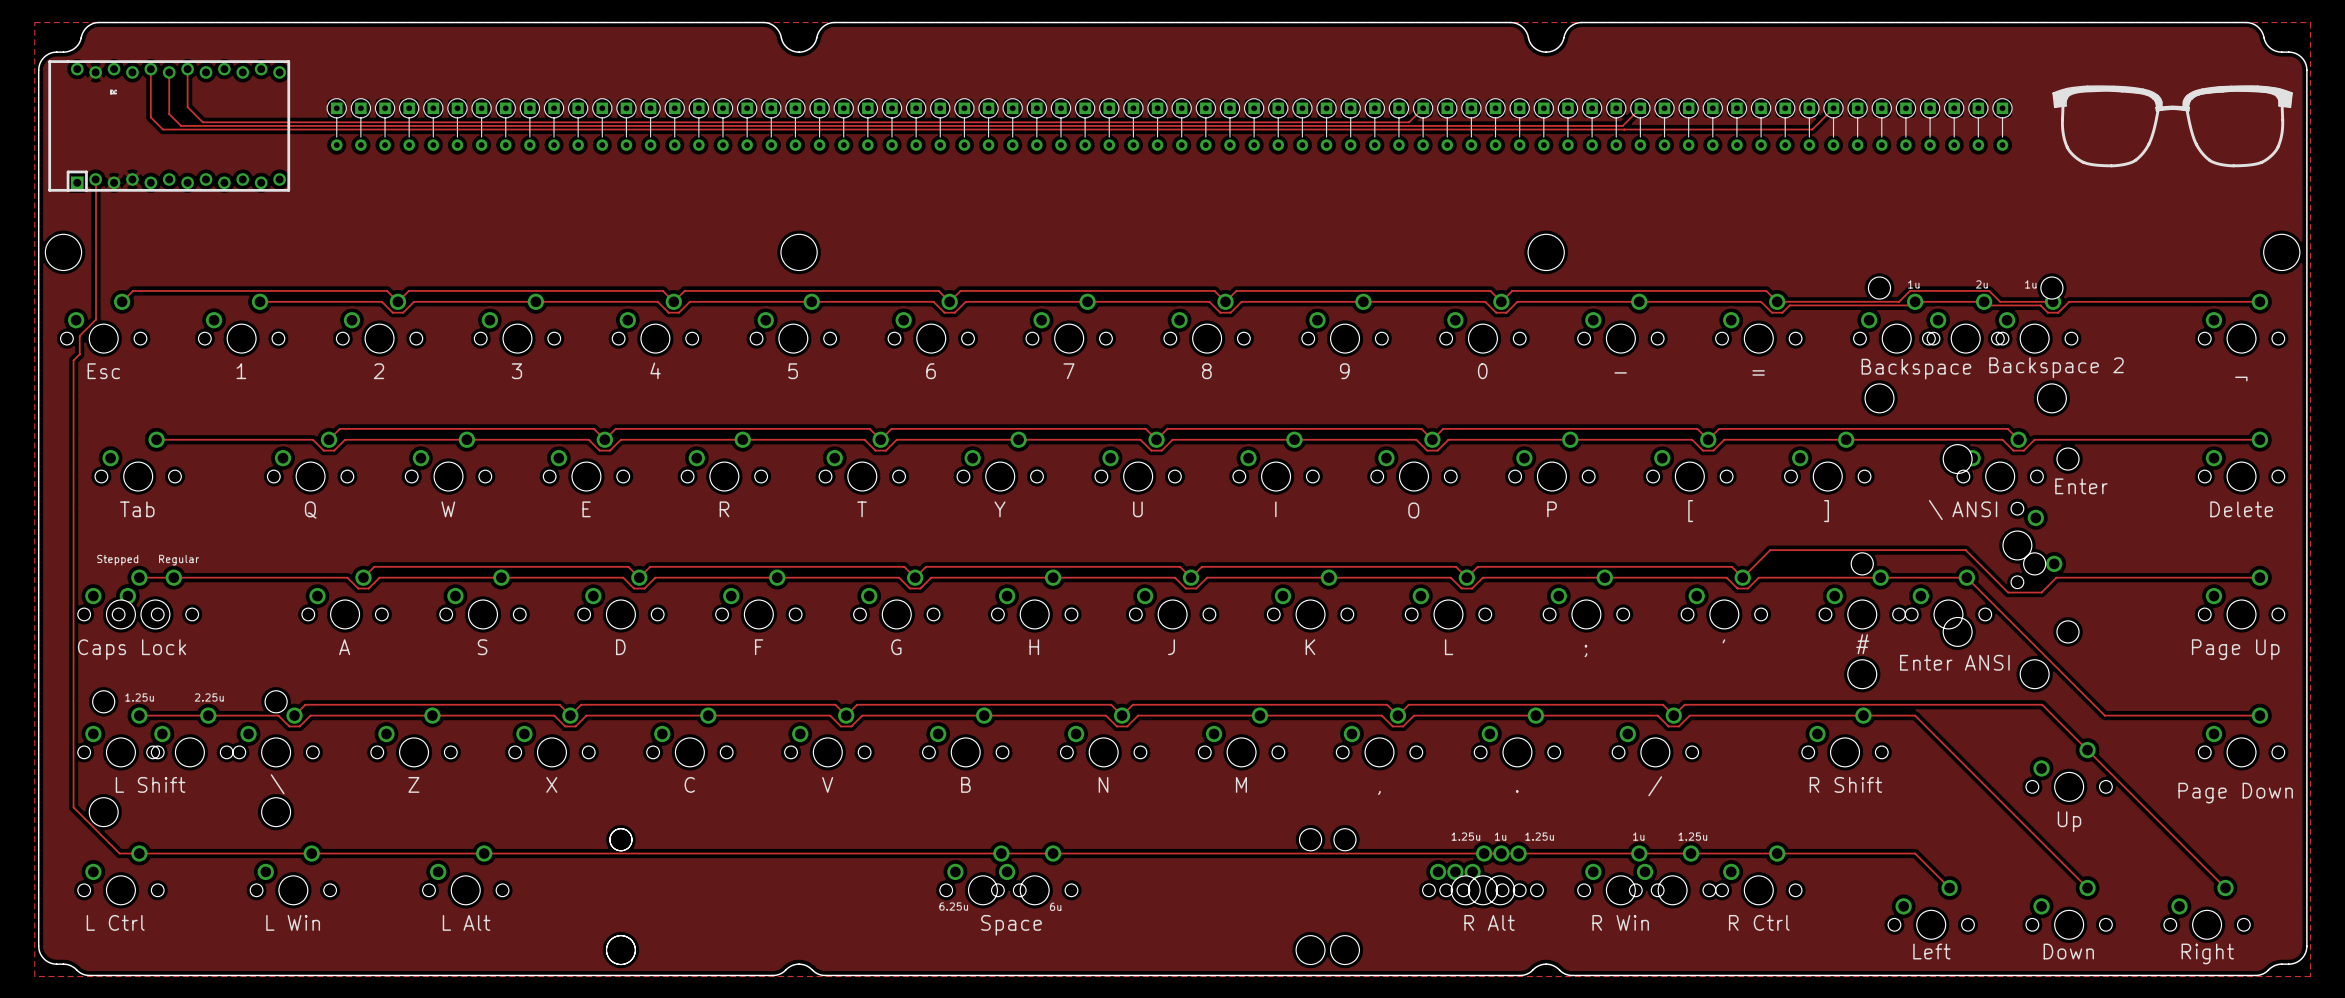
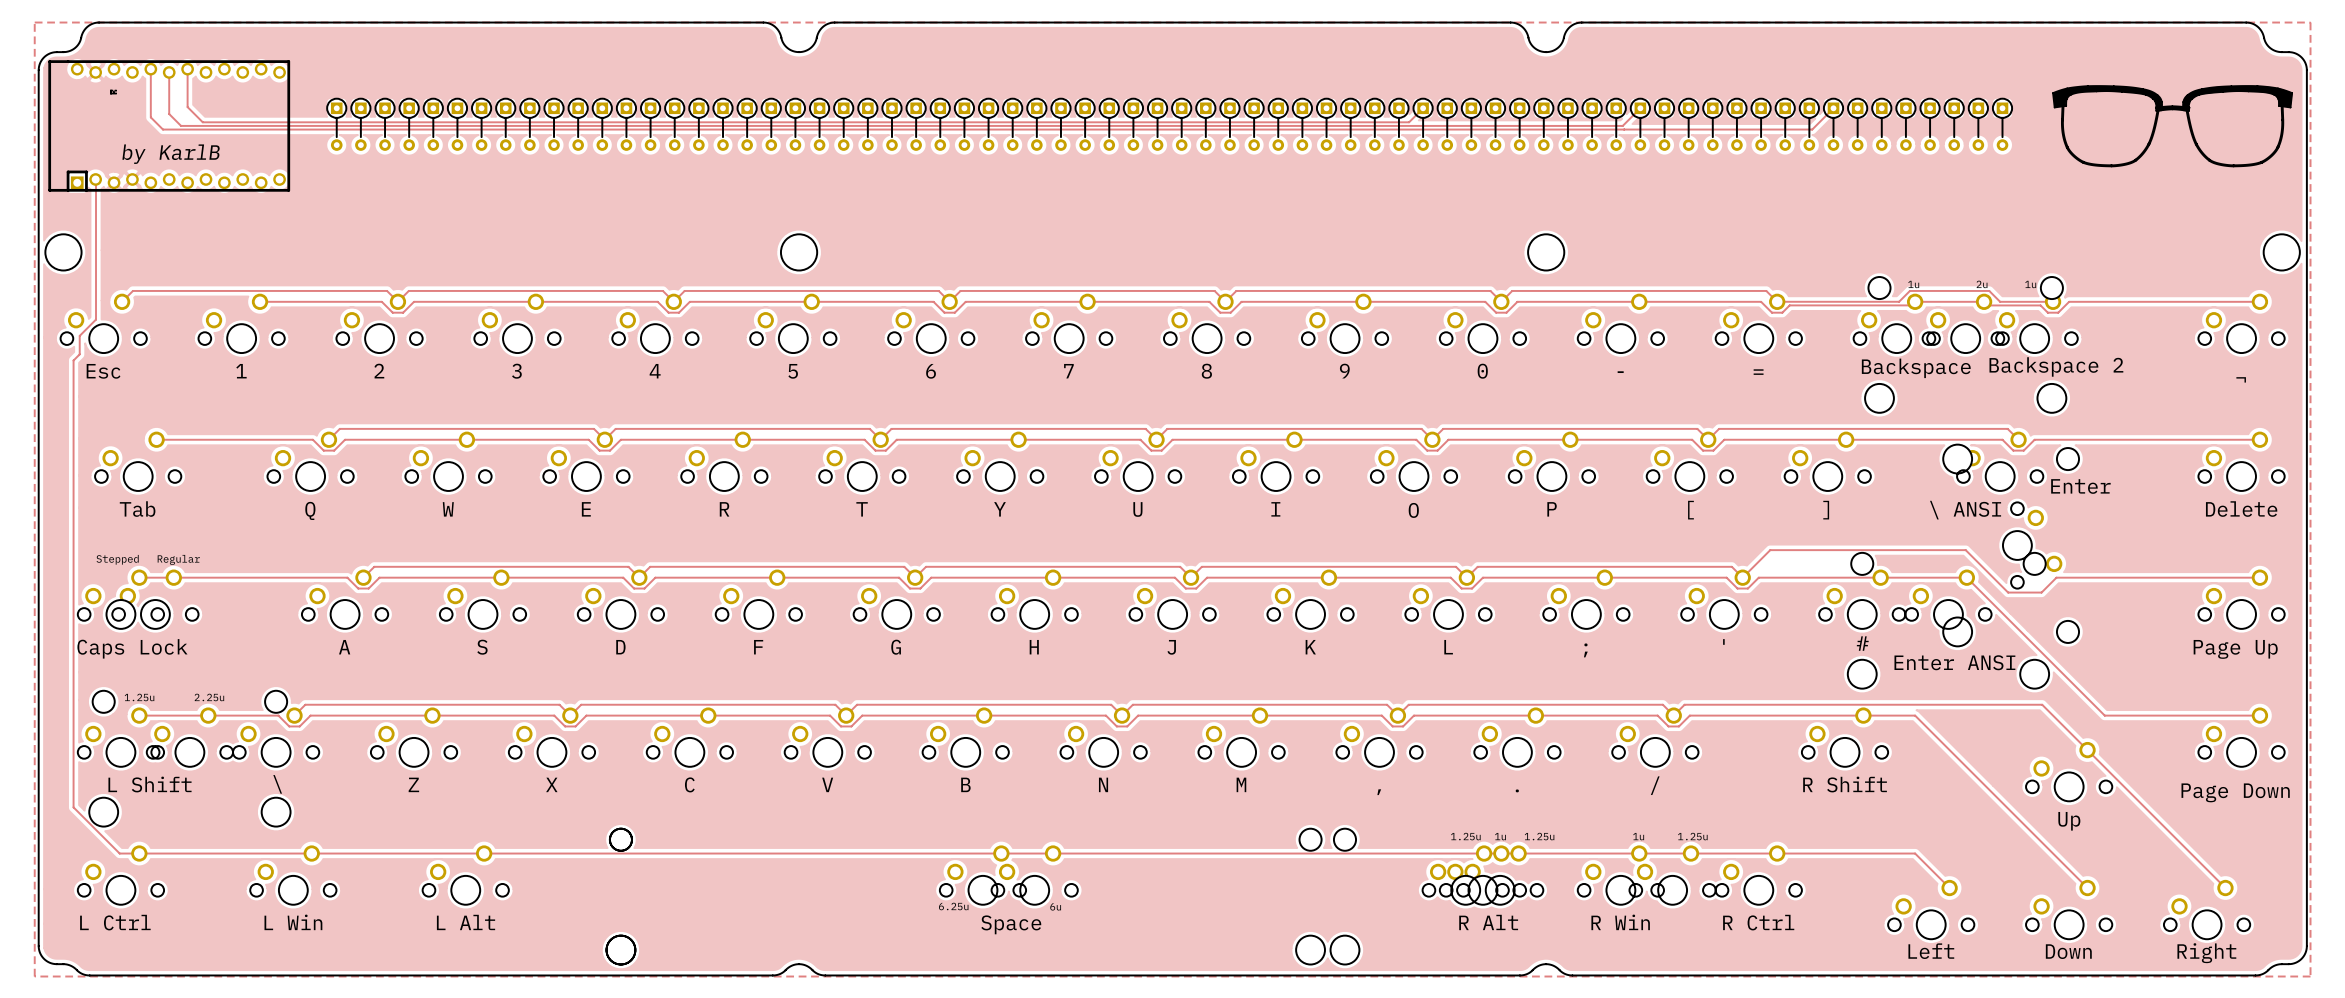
text: none -> by KarlB (171, 154)

